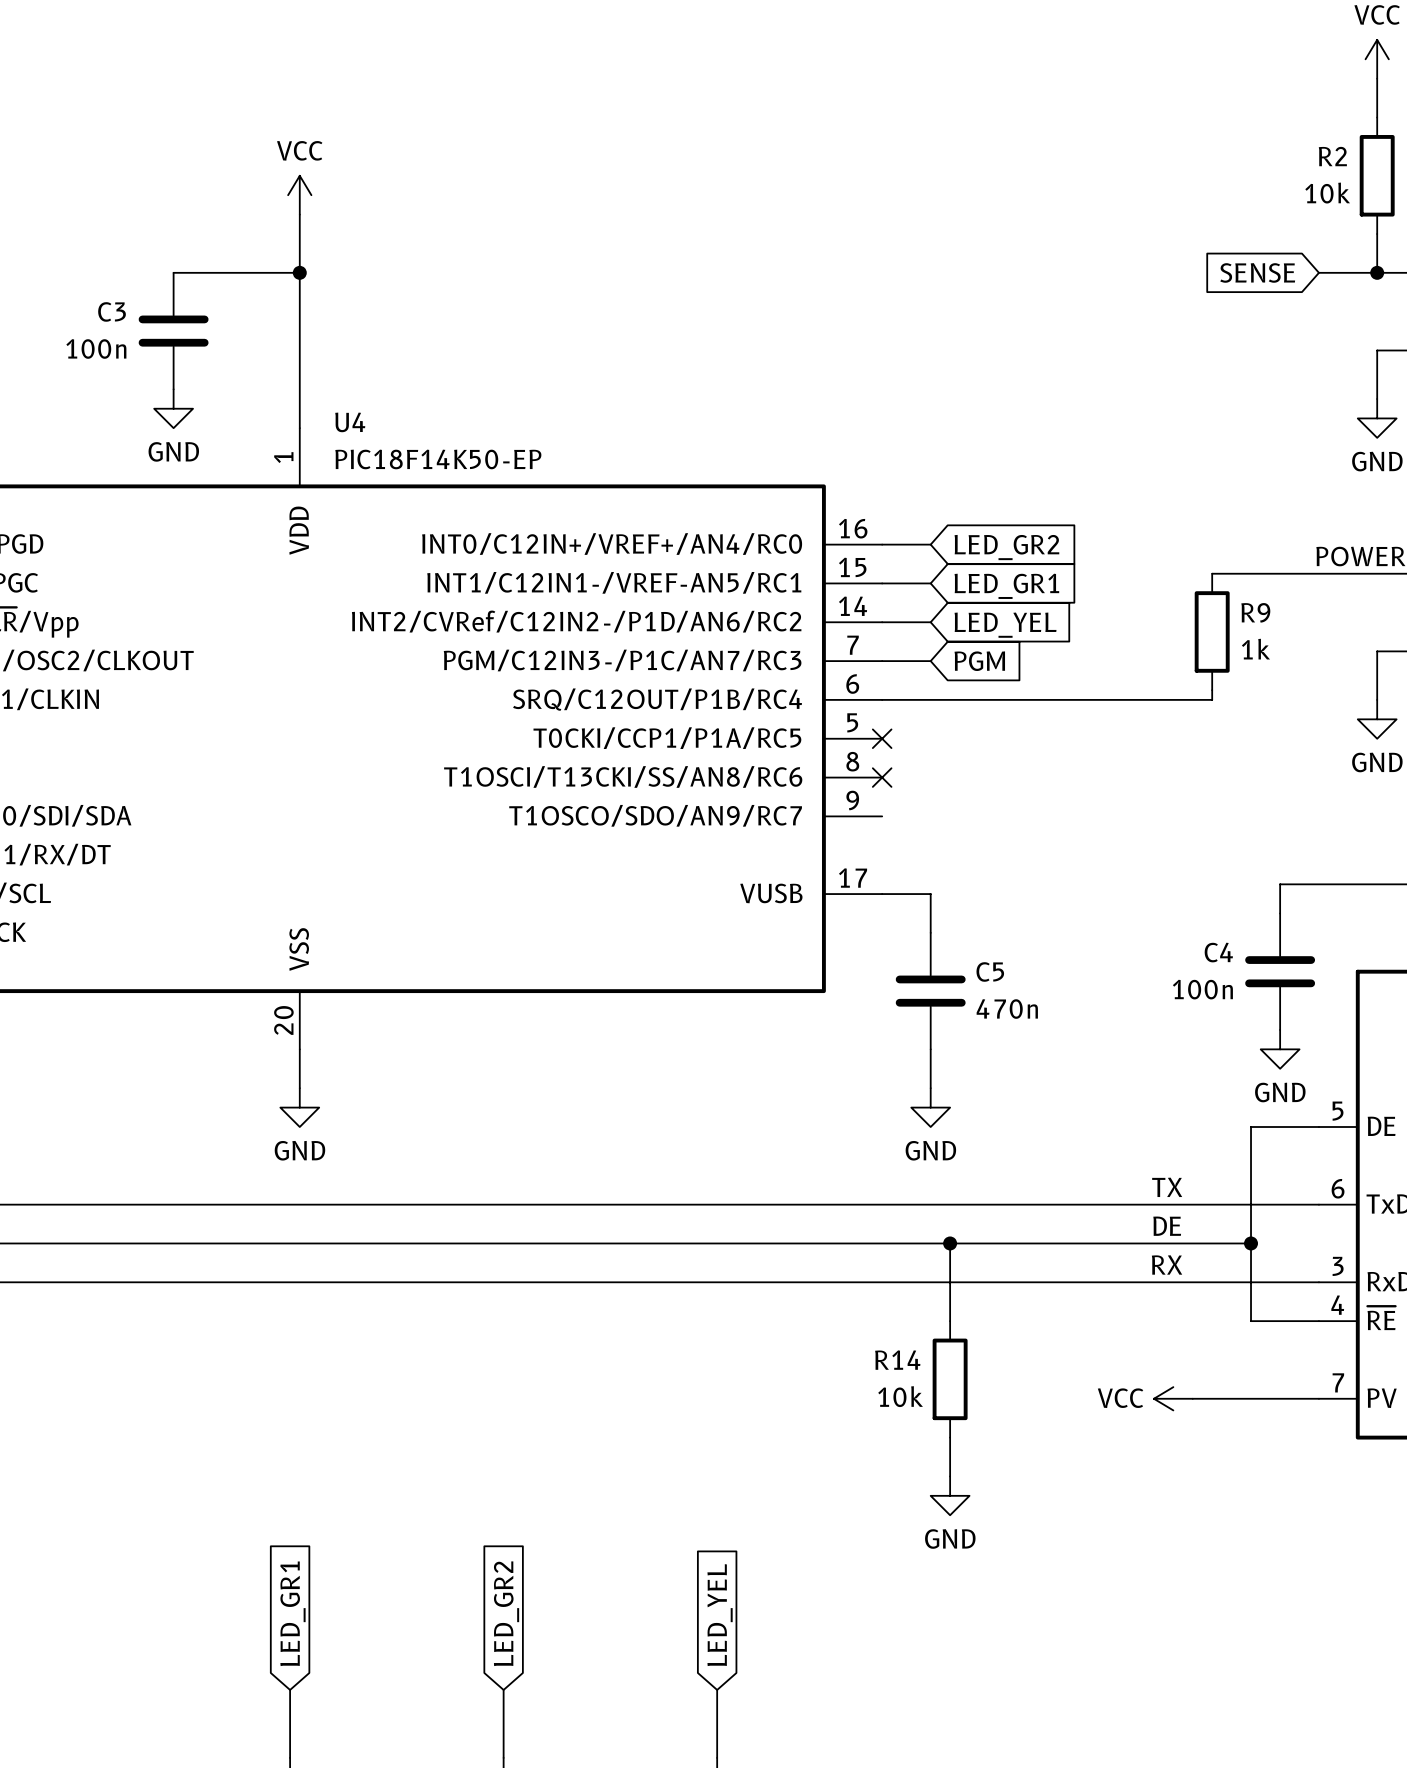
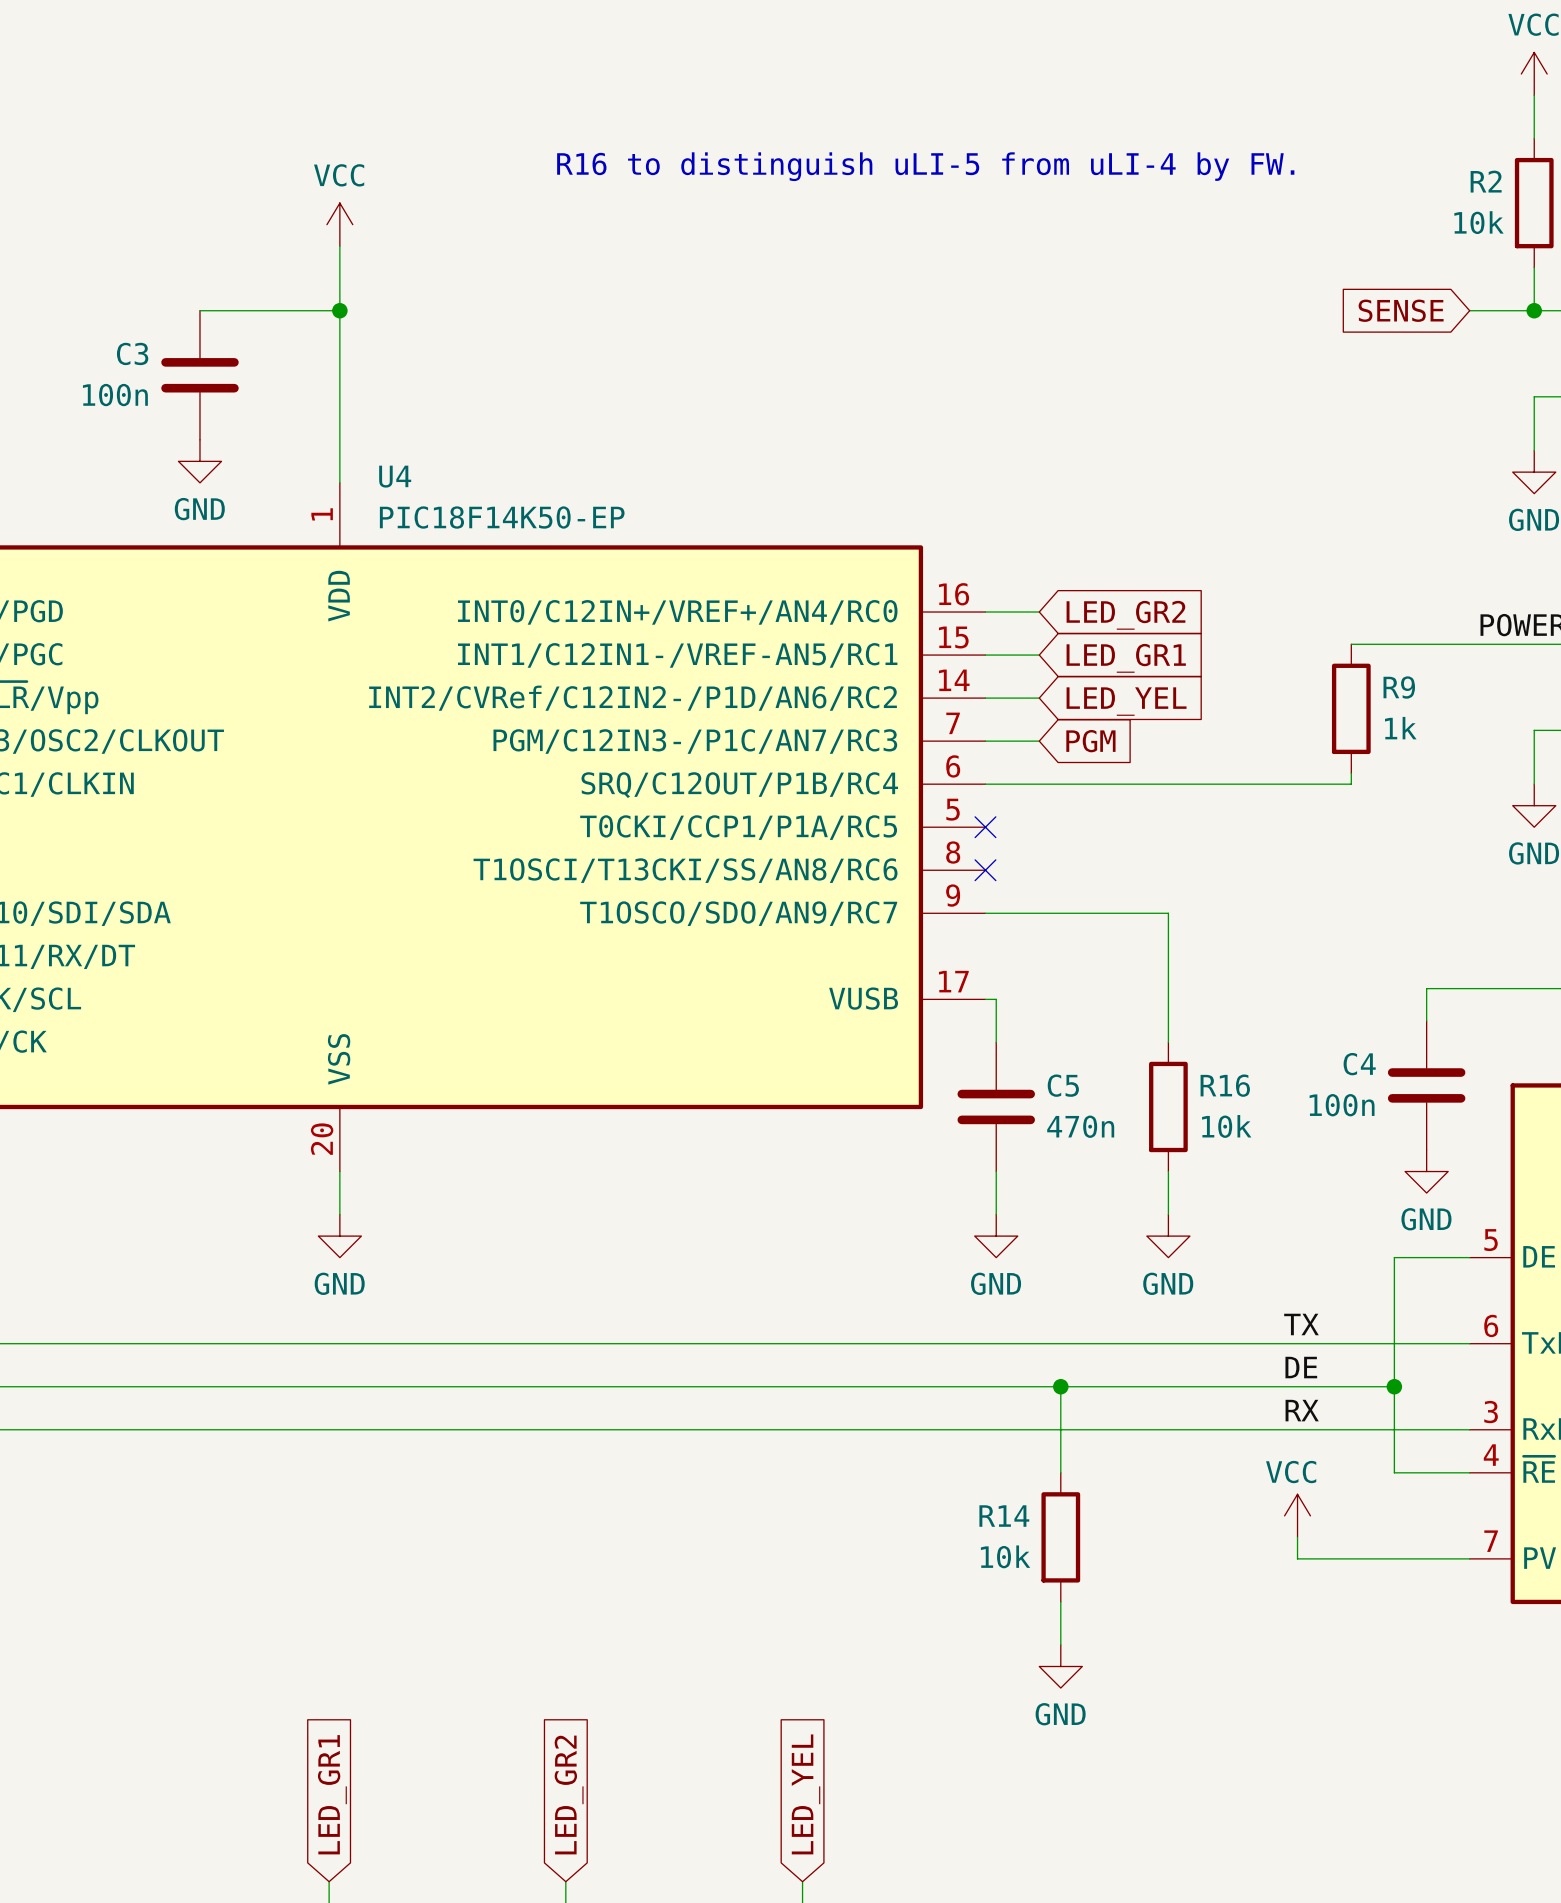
text: none -> R16 to distinguish uLI-5 from uLI-4 by FW. (925, 166)
wire: none -> (985, 913) (1168, 913) (1168, 1042)
wire: (891, 894) (930, 894) (930, 932) -> (996, 999) (996, 1042)
C5 position: (930, 991) -> (996, 1106)
R16: none -> 10k (1168, 1106)
wire: (930, 1049) (930, 1088) -> (996, 1171) (996, 1214)
wire: none -> (1168, 1171) (1168, 1214)
power symbol position: GND (930, 1107) -> GND (996, 1236)
power symbol: none -> GND (1168, 1236)
wire: none -> (1297, 1537) (1297, 1558) (1329, 1558)
power symbol rotation: 0° (1173, 1398) -> 90° clockwise (1297, 1515)
power symbol position: VCC (1173, 1398) -> VCC (1297, 1515)

